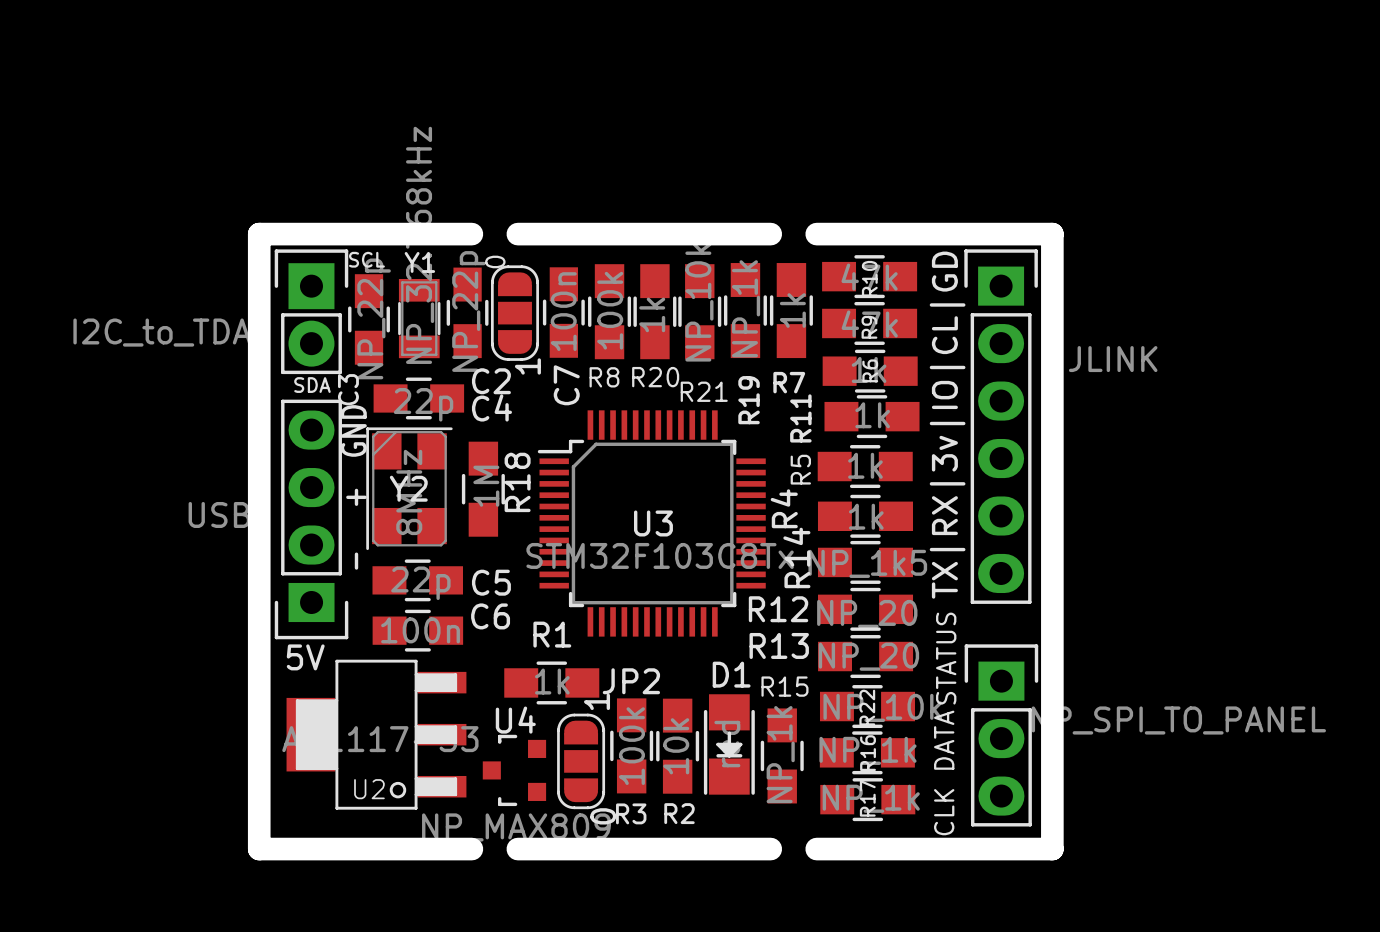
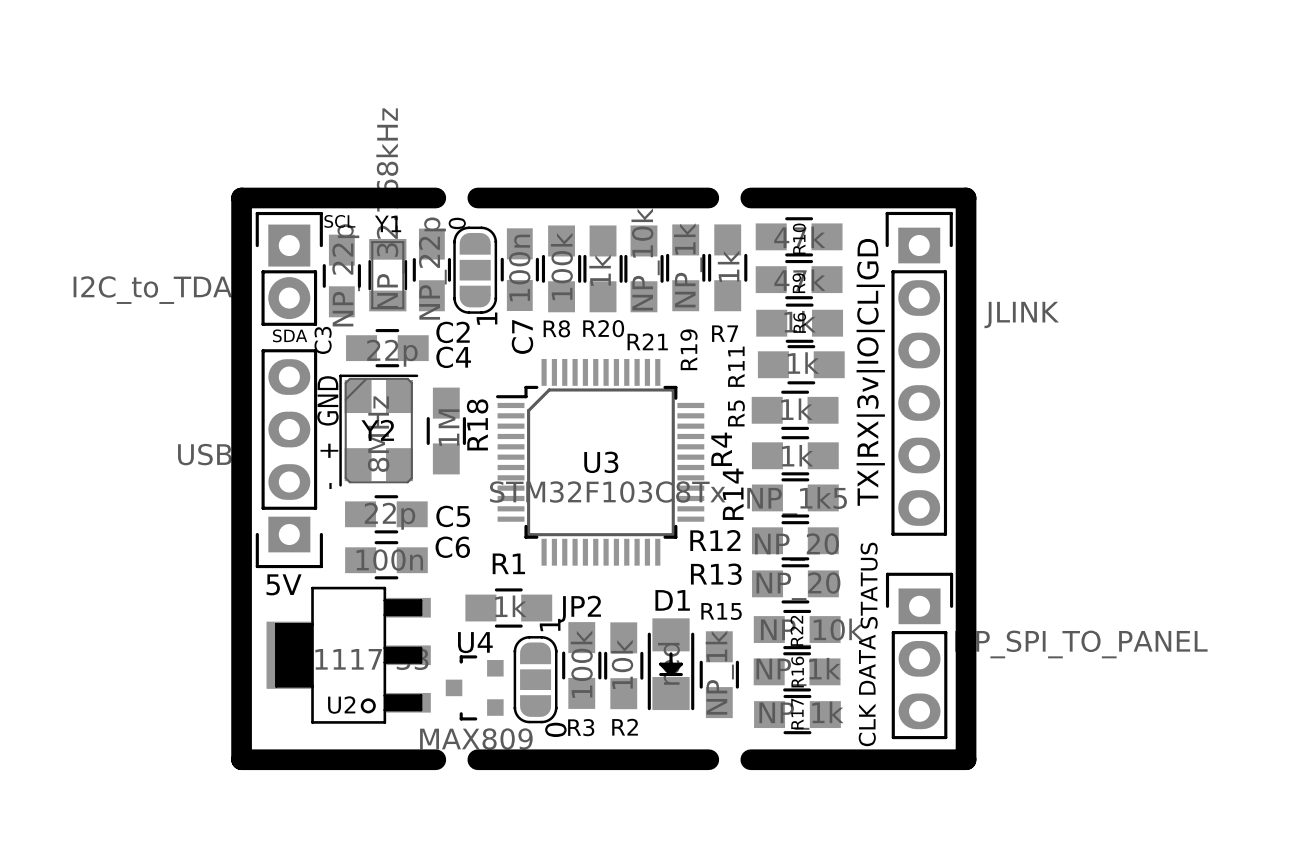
U4 value: NP_MAX809 (516, 827) -> MAX809 (476, 739)

